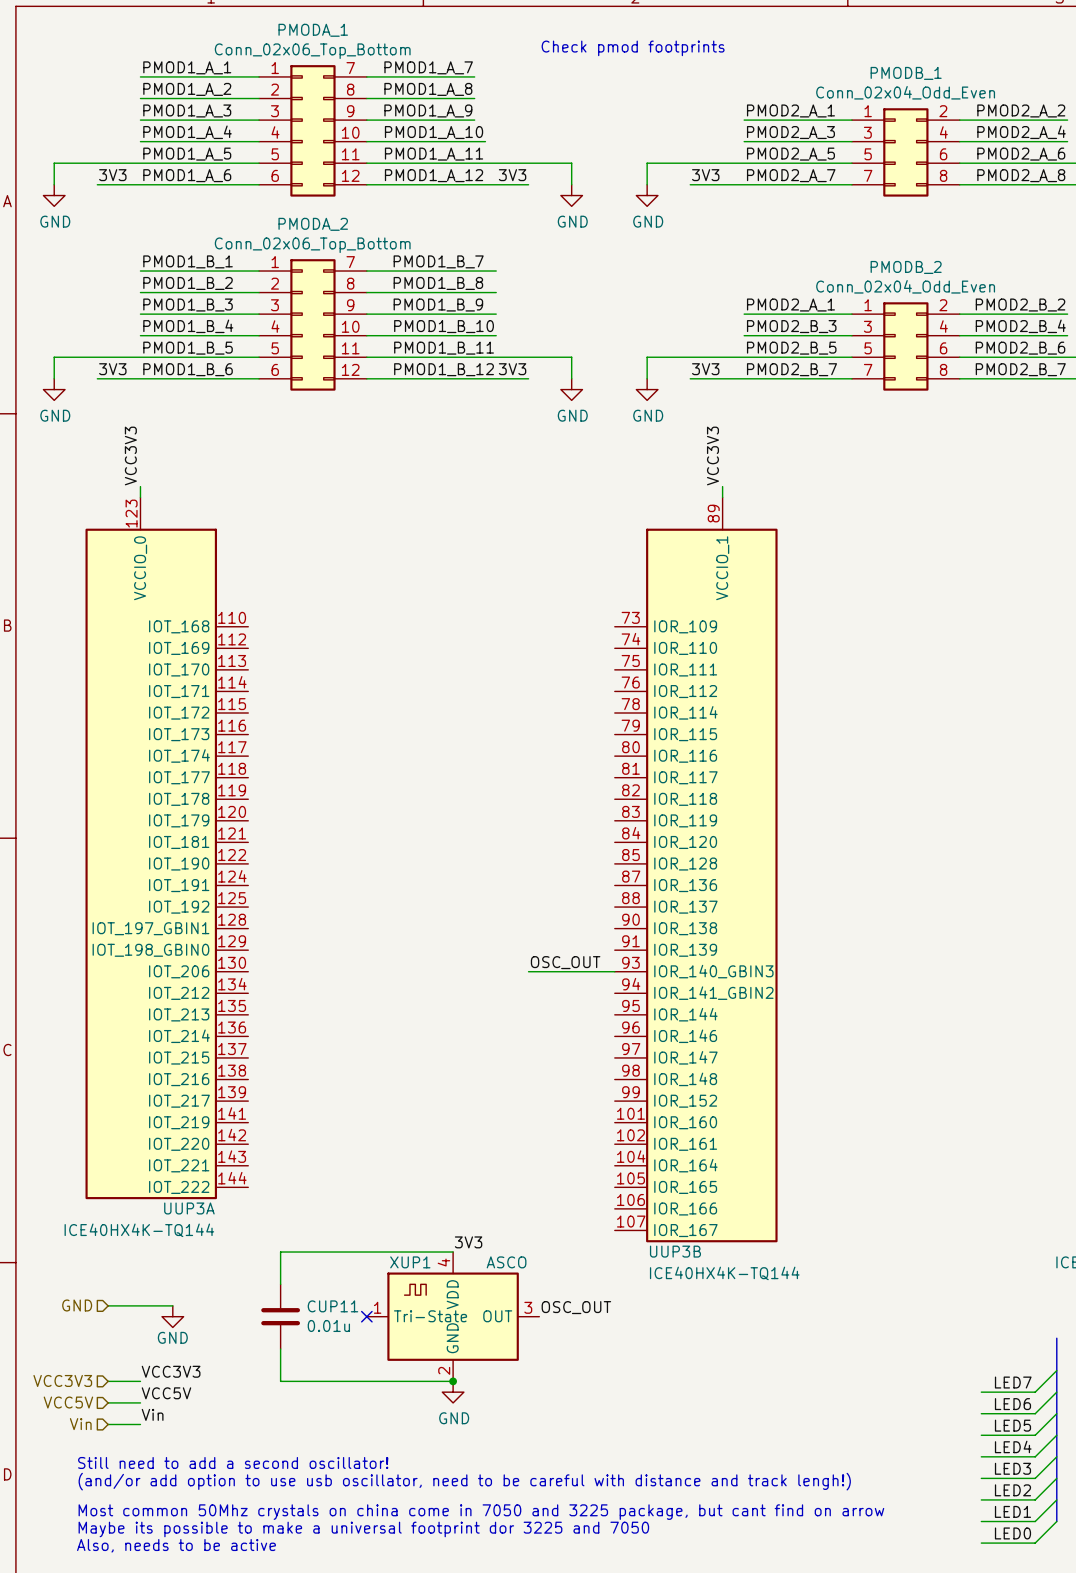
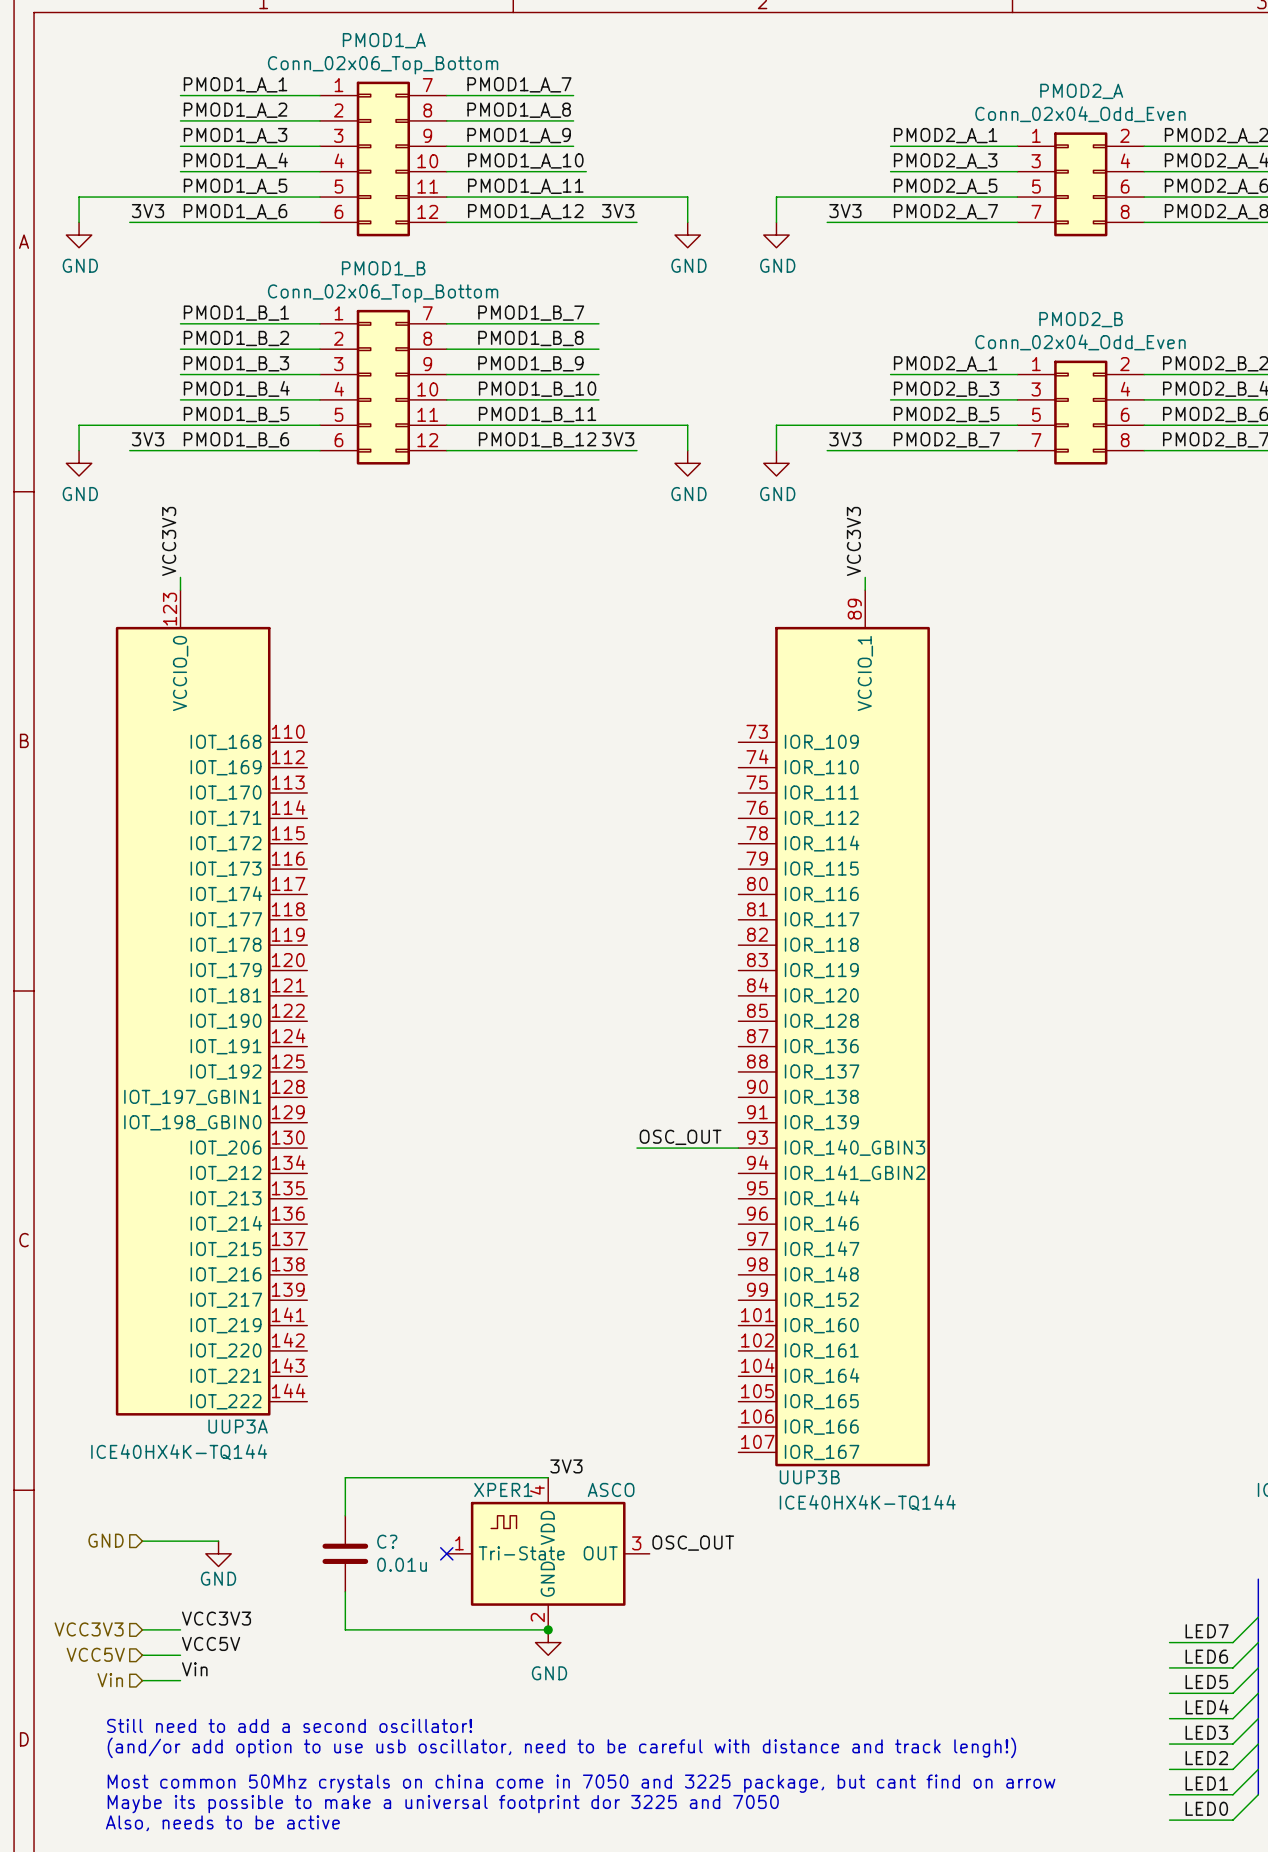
PMODA_1 name: PMODA_1 (313, 30) -> PMOD1_A (384, 40)
text: Check pmod footprints (633, 48) -> none
PMODB_1 name: PMODB_1 (906, 73) -> PMOD2_A (1081, 91)
PMODA_2 name: PMODA_2 (313, 224) -> PMOD1_B (383, 268)
PMODB_2 name: PMODB_2 (906, 267) -> PMOD2_B (1081, 319)
XUP1 name: XUP1 (410, 1262) -> XPER1 (503, 1489)
CUP11 name: CUP11 (332, 1306) -> C? (387, 1541)

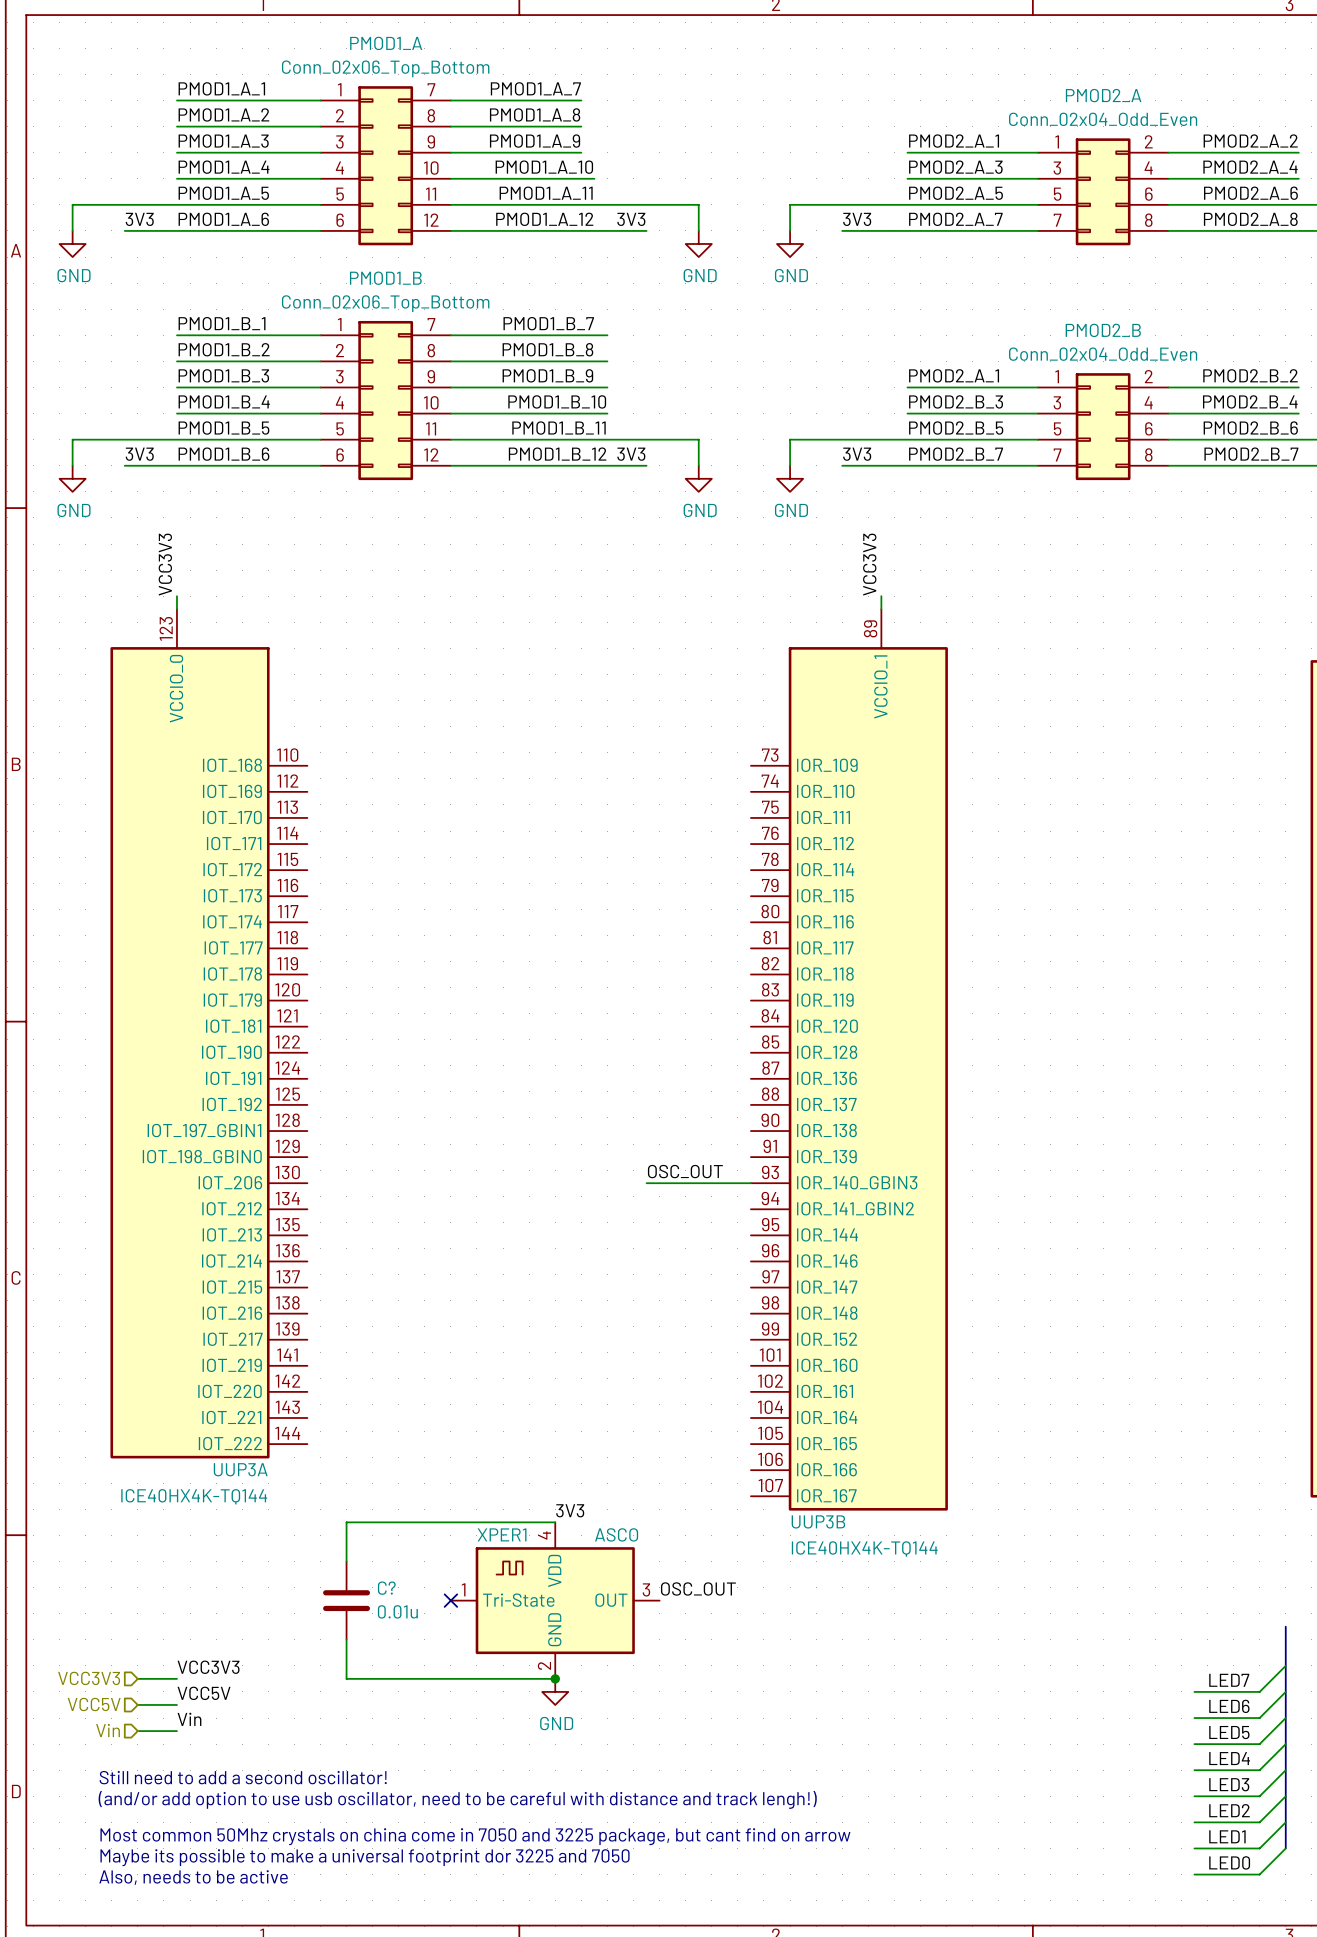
hierarchical label: GND (106, 1540) -> none
wire: (142, 1541) (218, 1541) -> none
power symbol: GND (218, 1553) -> none

